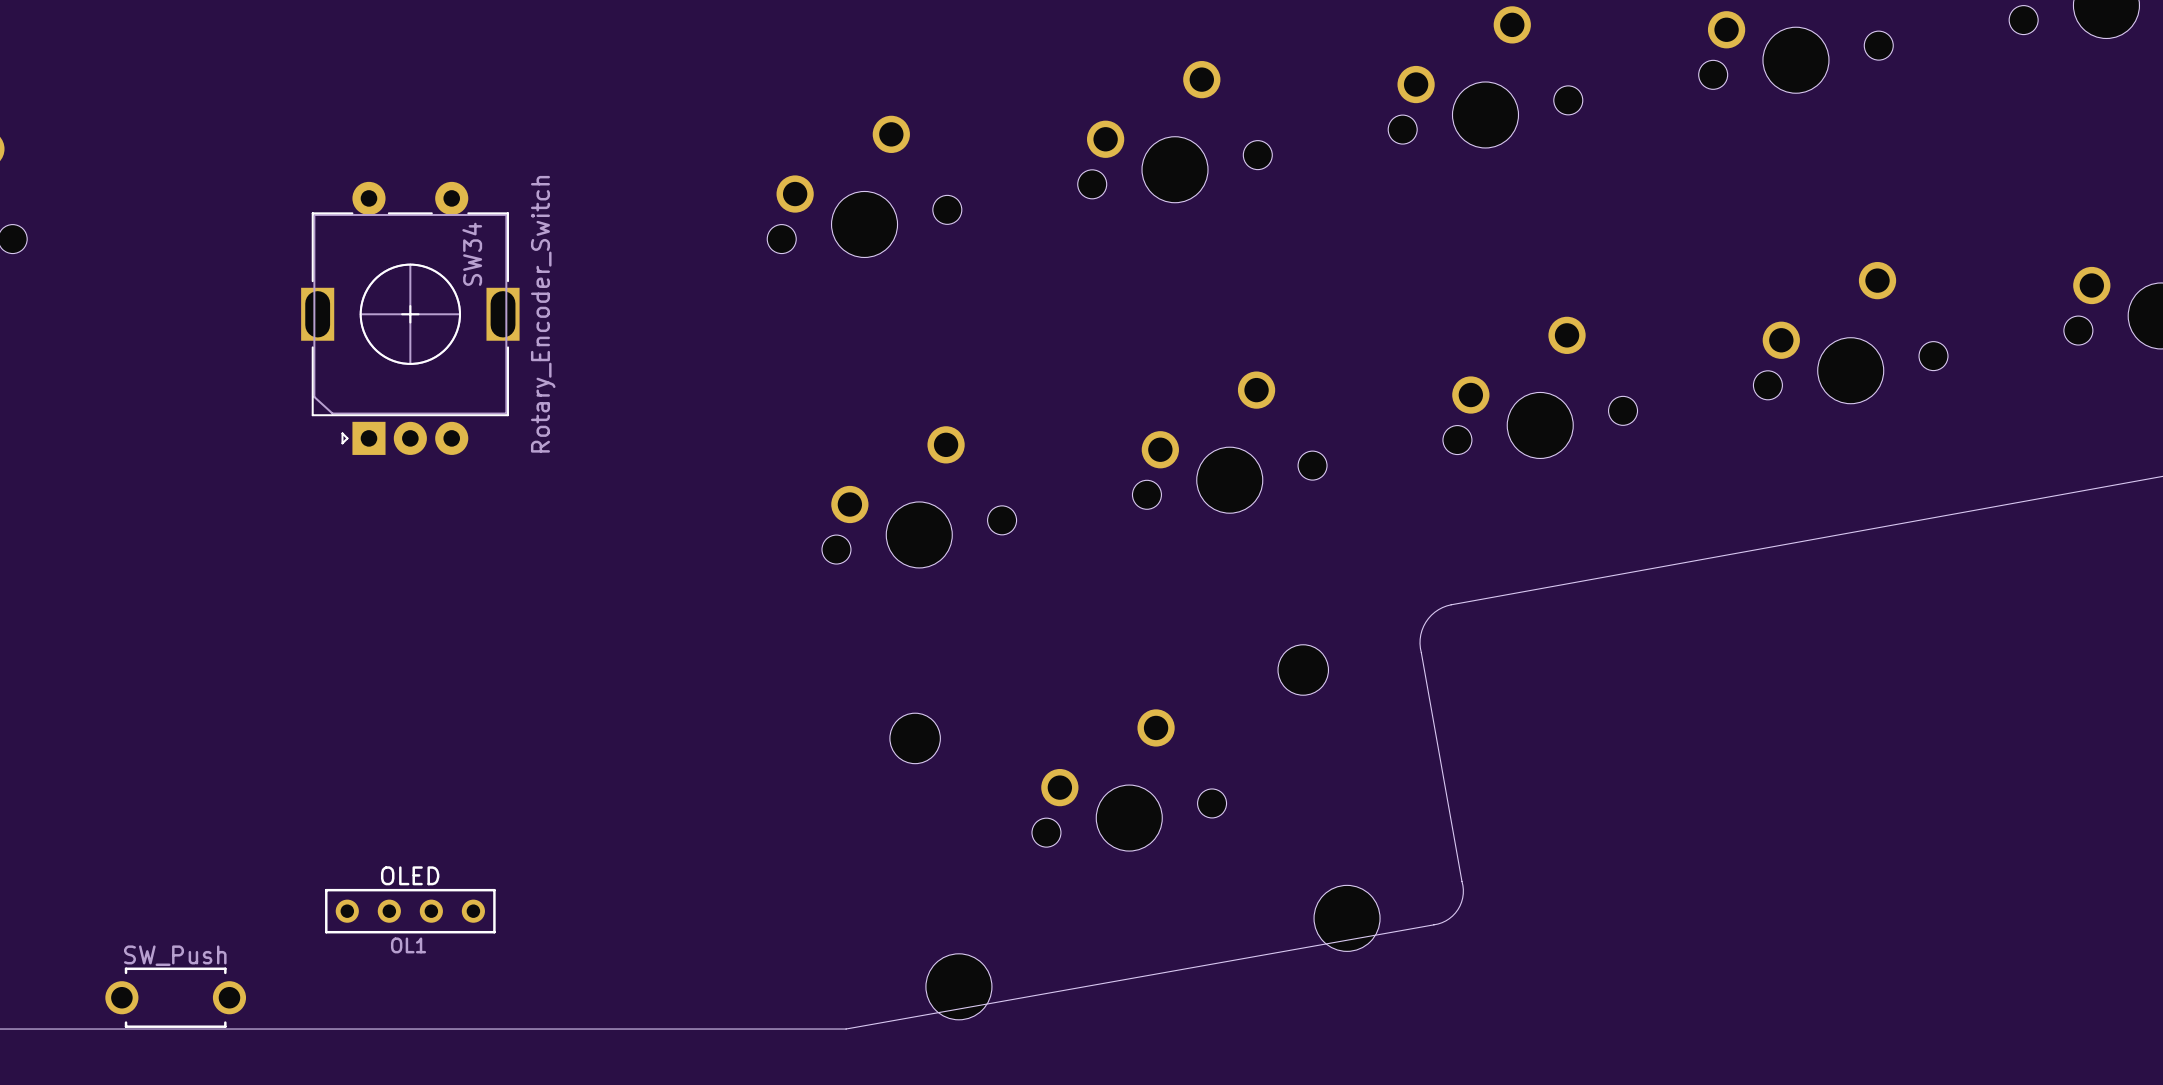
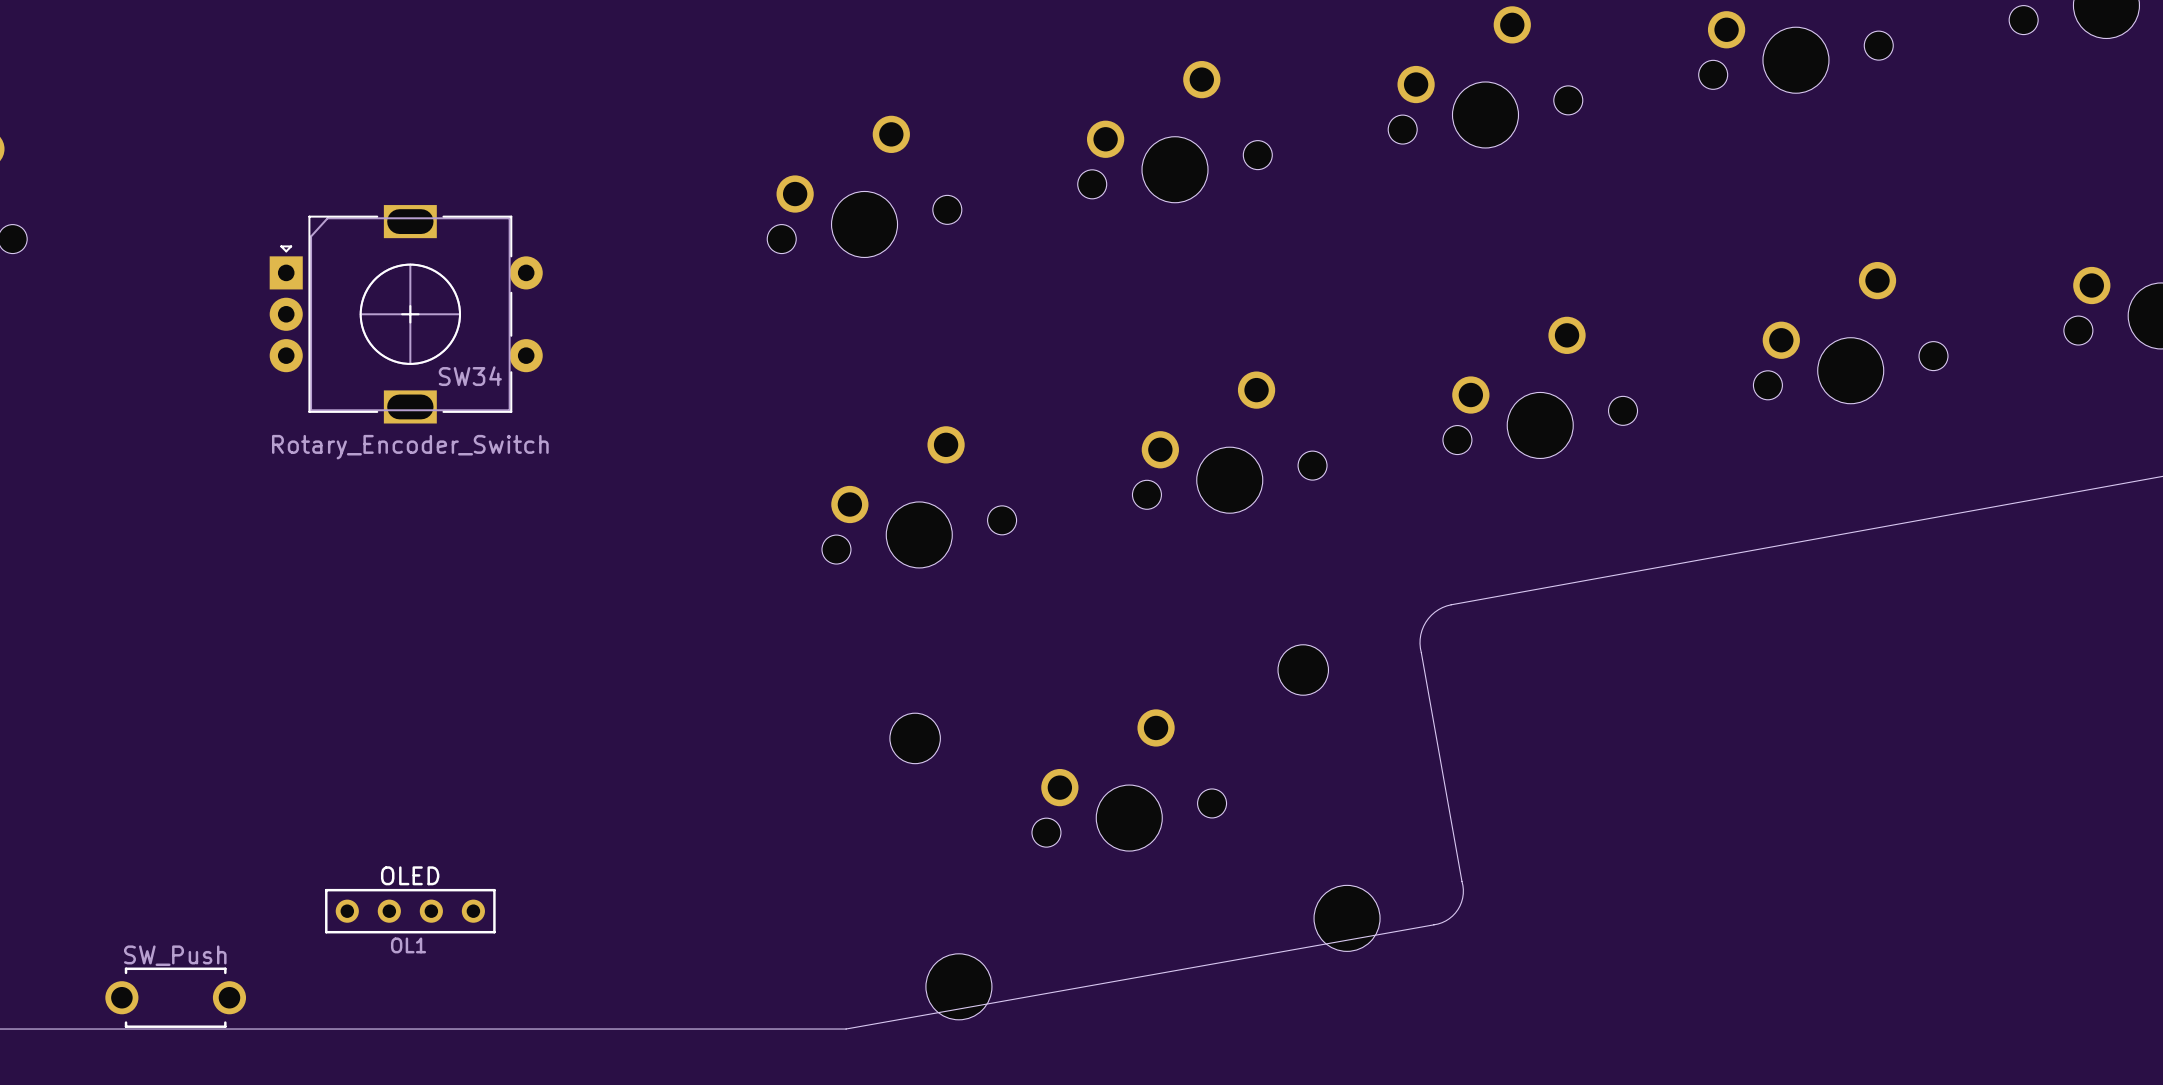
SW34 rotation: 0° (410, 318) -> 90° clockwise (406, 314)

